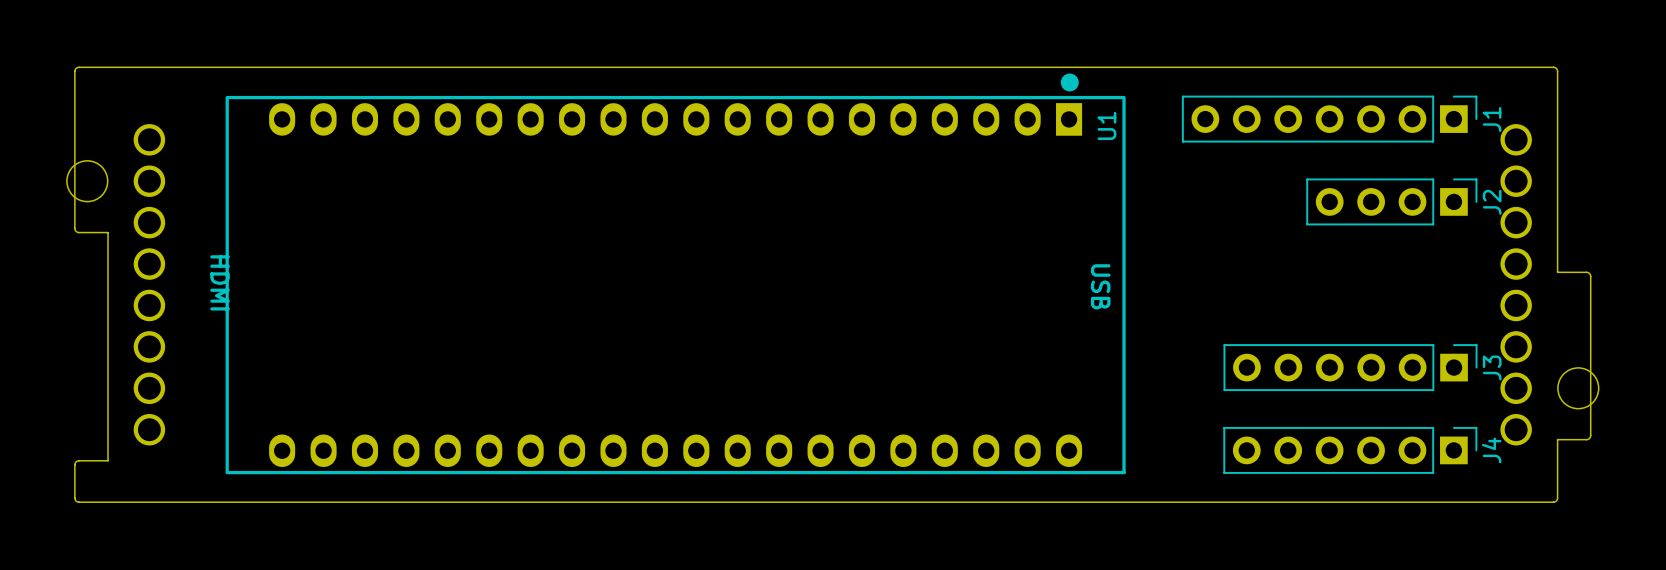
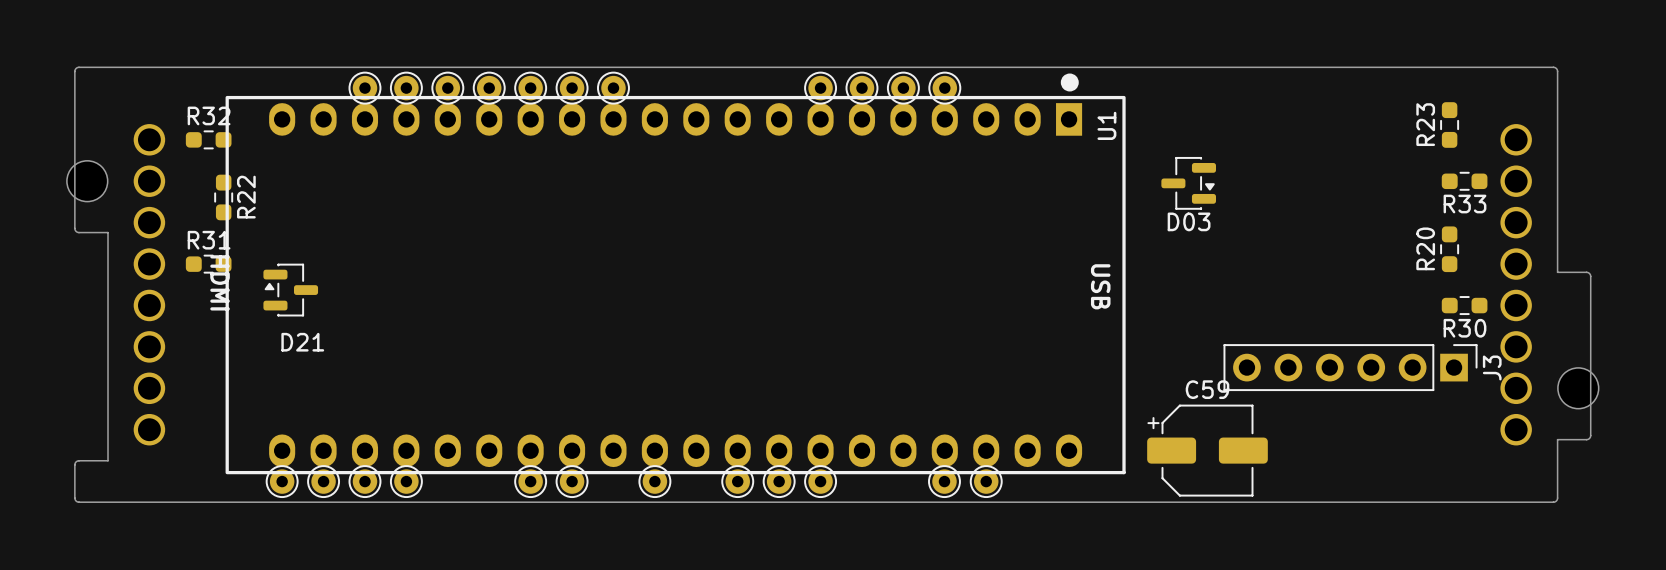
part: none -> (364, 88)
part: none -> (406, 88)
part: none -> (447, 88)
part: none -> (489, 88)
part: none -> (530, 88)
part: none -> (572, 88)
part: none -> (613, 88)
part: none -> (820, 88)
part: none -> (861, 88)
part: none -> (903, 88)
part: none -> (944, 88)
J1: (1329, 119) -> none
R23: none -> (1449, 125)
R32: none -> (208, 139)
R33: none -> (1464, 181)
D03: none -> (1188, 183)
R22: none -> (223, 197)
J2: (1391, 201) -> none
R20: none -> (1449, 249)
R31: none -> (208, 264)
D21: none -> (290, 290)
R30: none -> (1464, 305)
C59: none -> (1207, 450)
J4: (1350, 450) -> none
part: none -> (282, 481)
part: none -> (323, 481)
part: none -> (364, 481)
part: none -> (406, 481)
part: none -> (530, 481)
part: none -> (572, 481)
part: none -> (654, 481)
part: none -> (737, 481)
part: none -> (779, 481)
part: none -> (820, 481)
part: none -> (944, 481)
part: none -> (986, 481)

